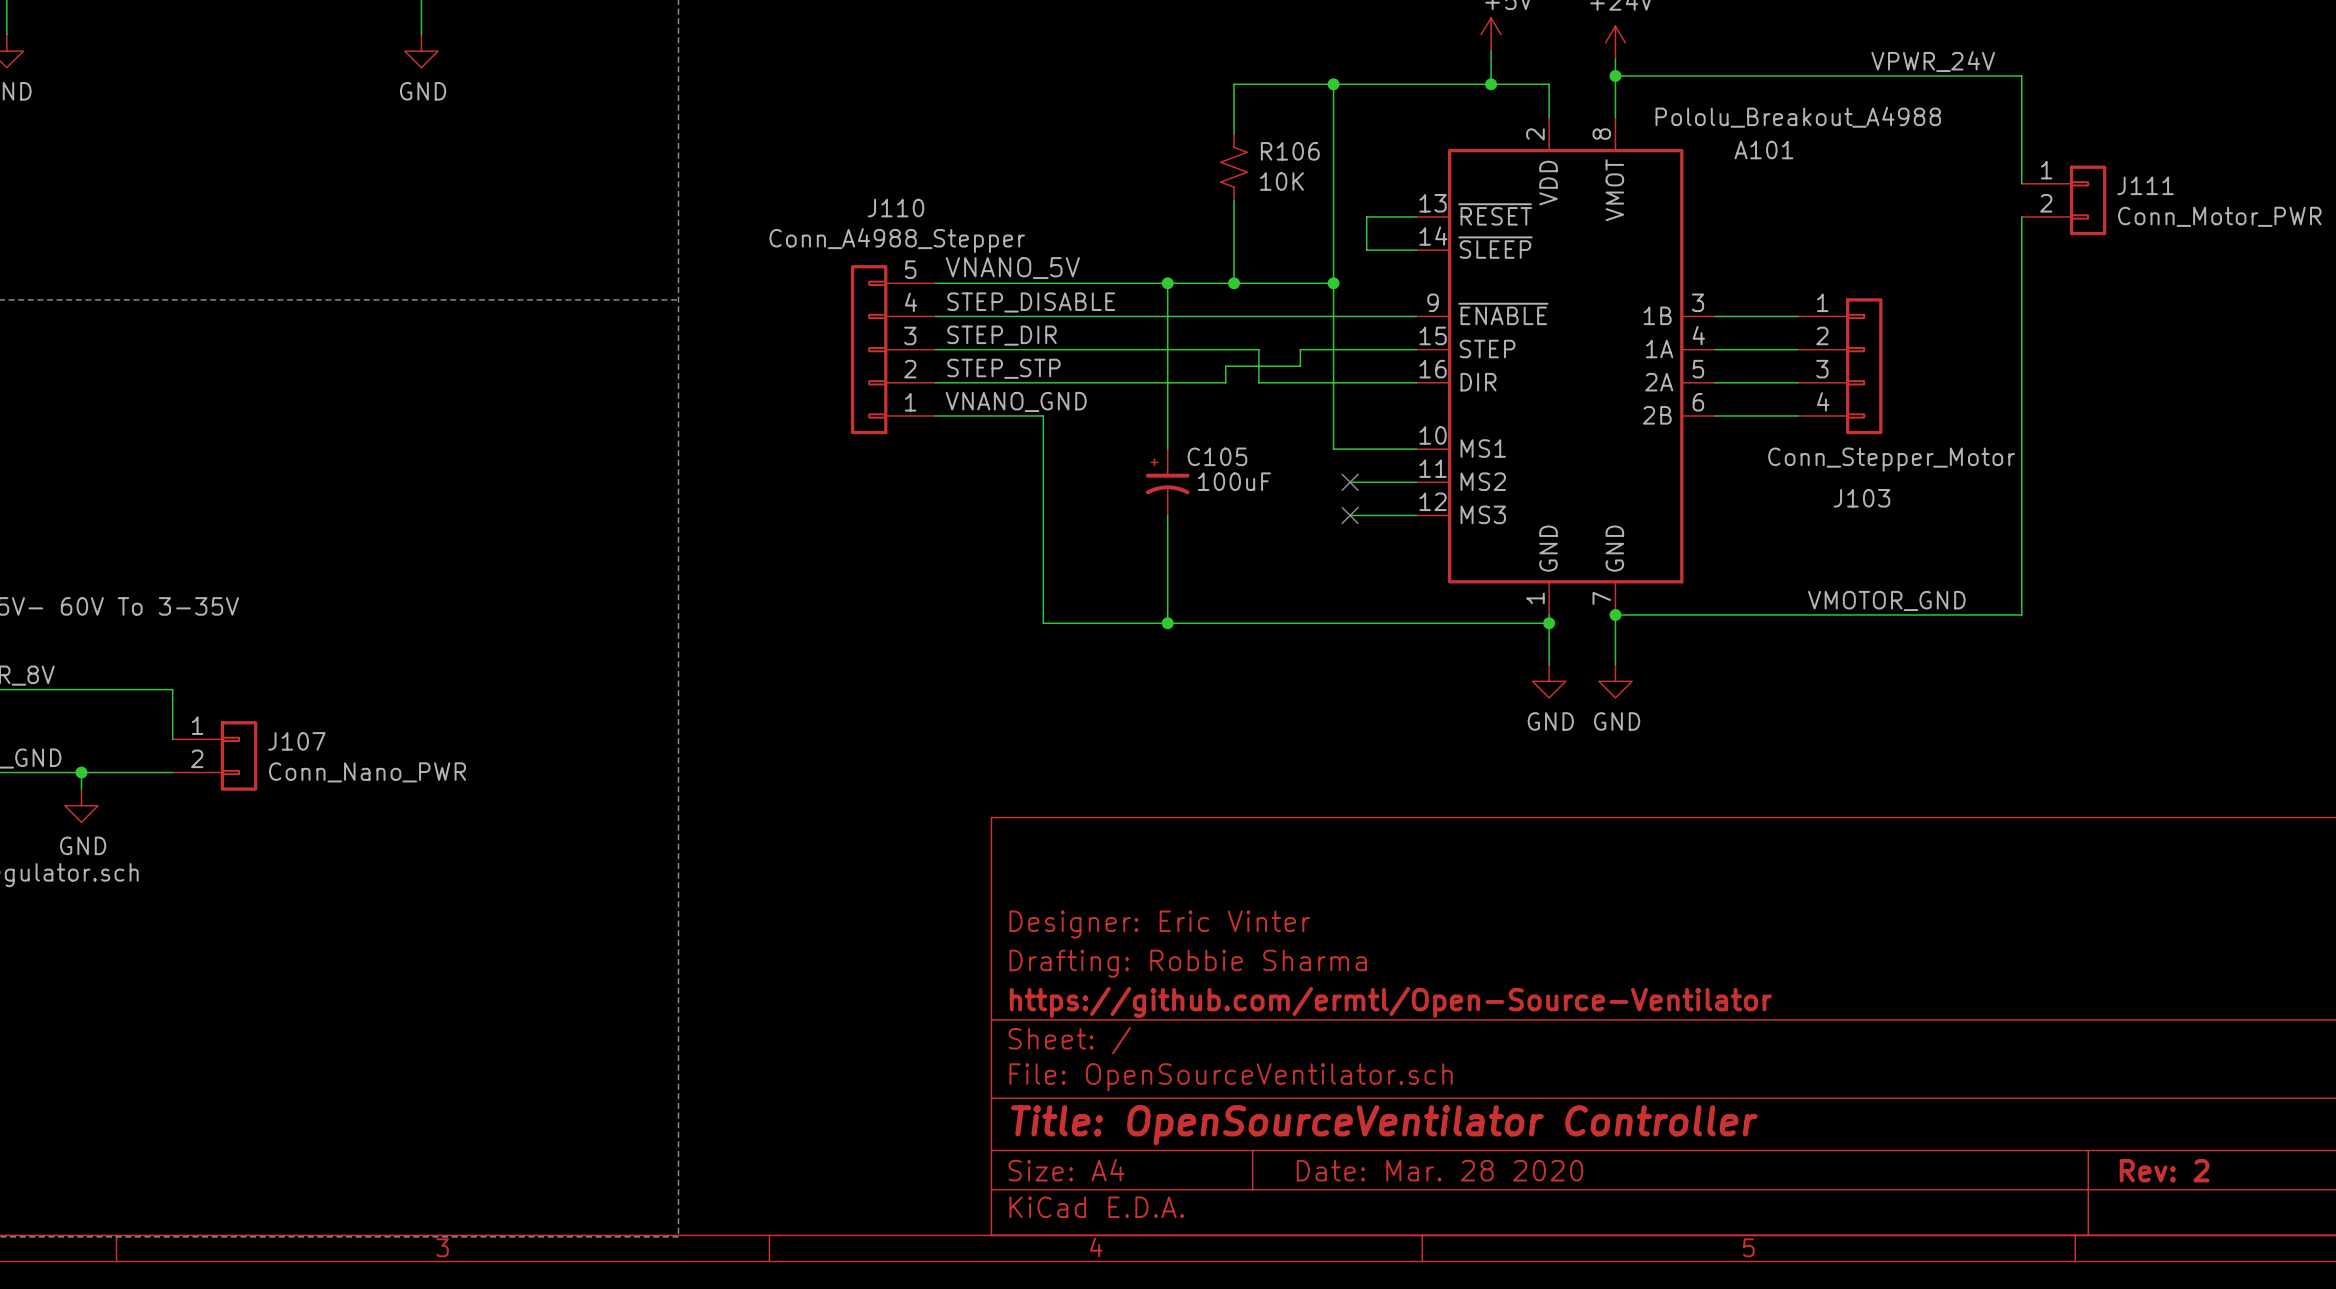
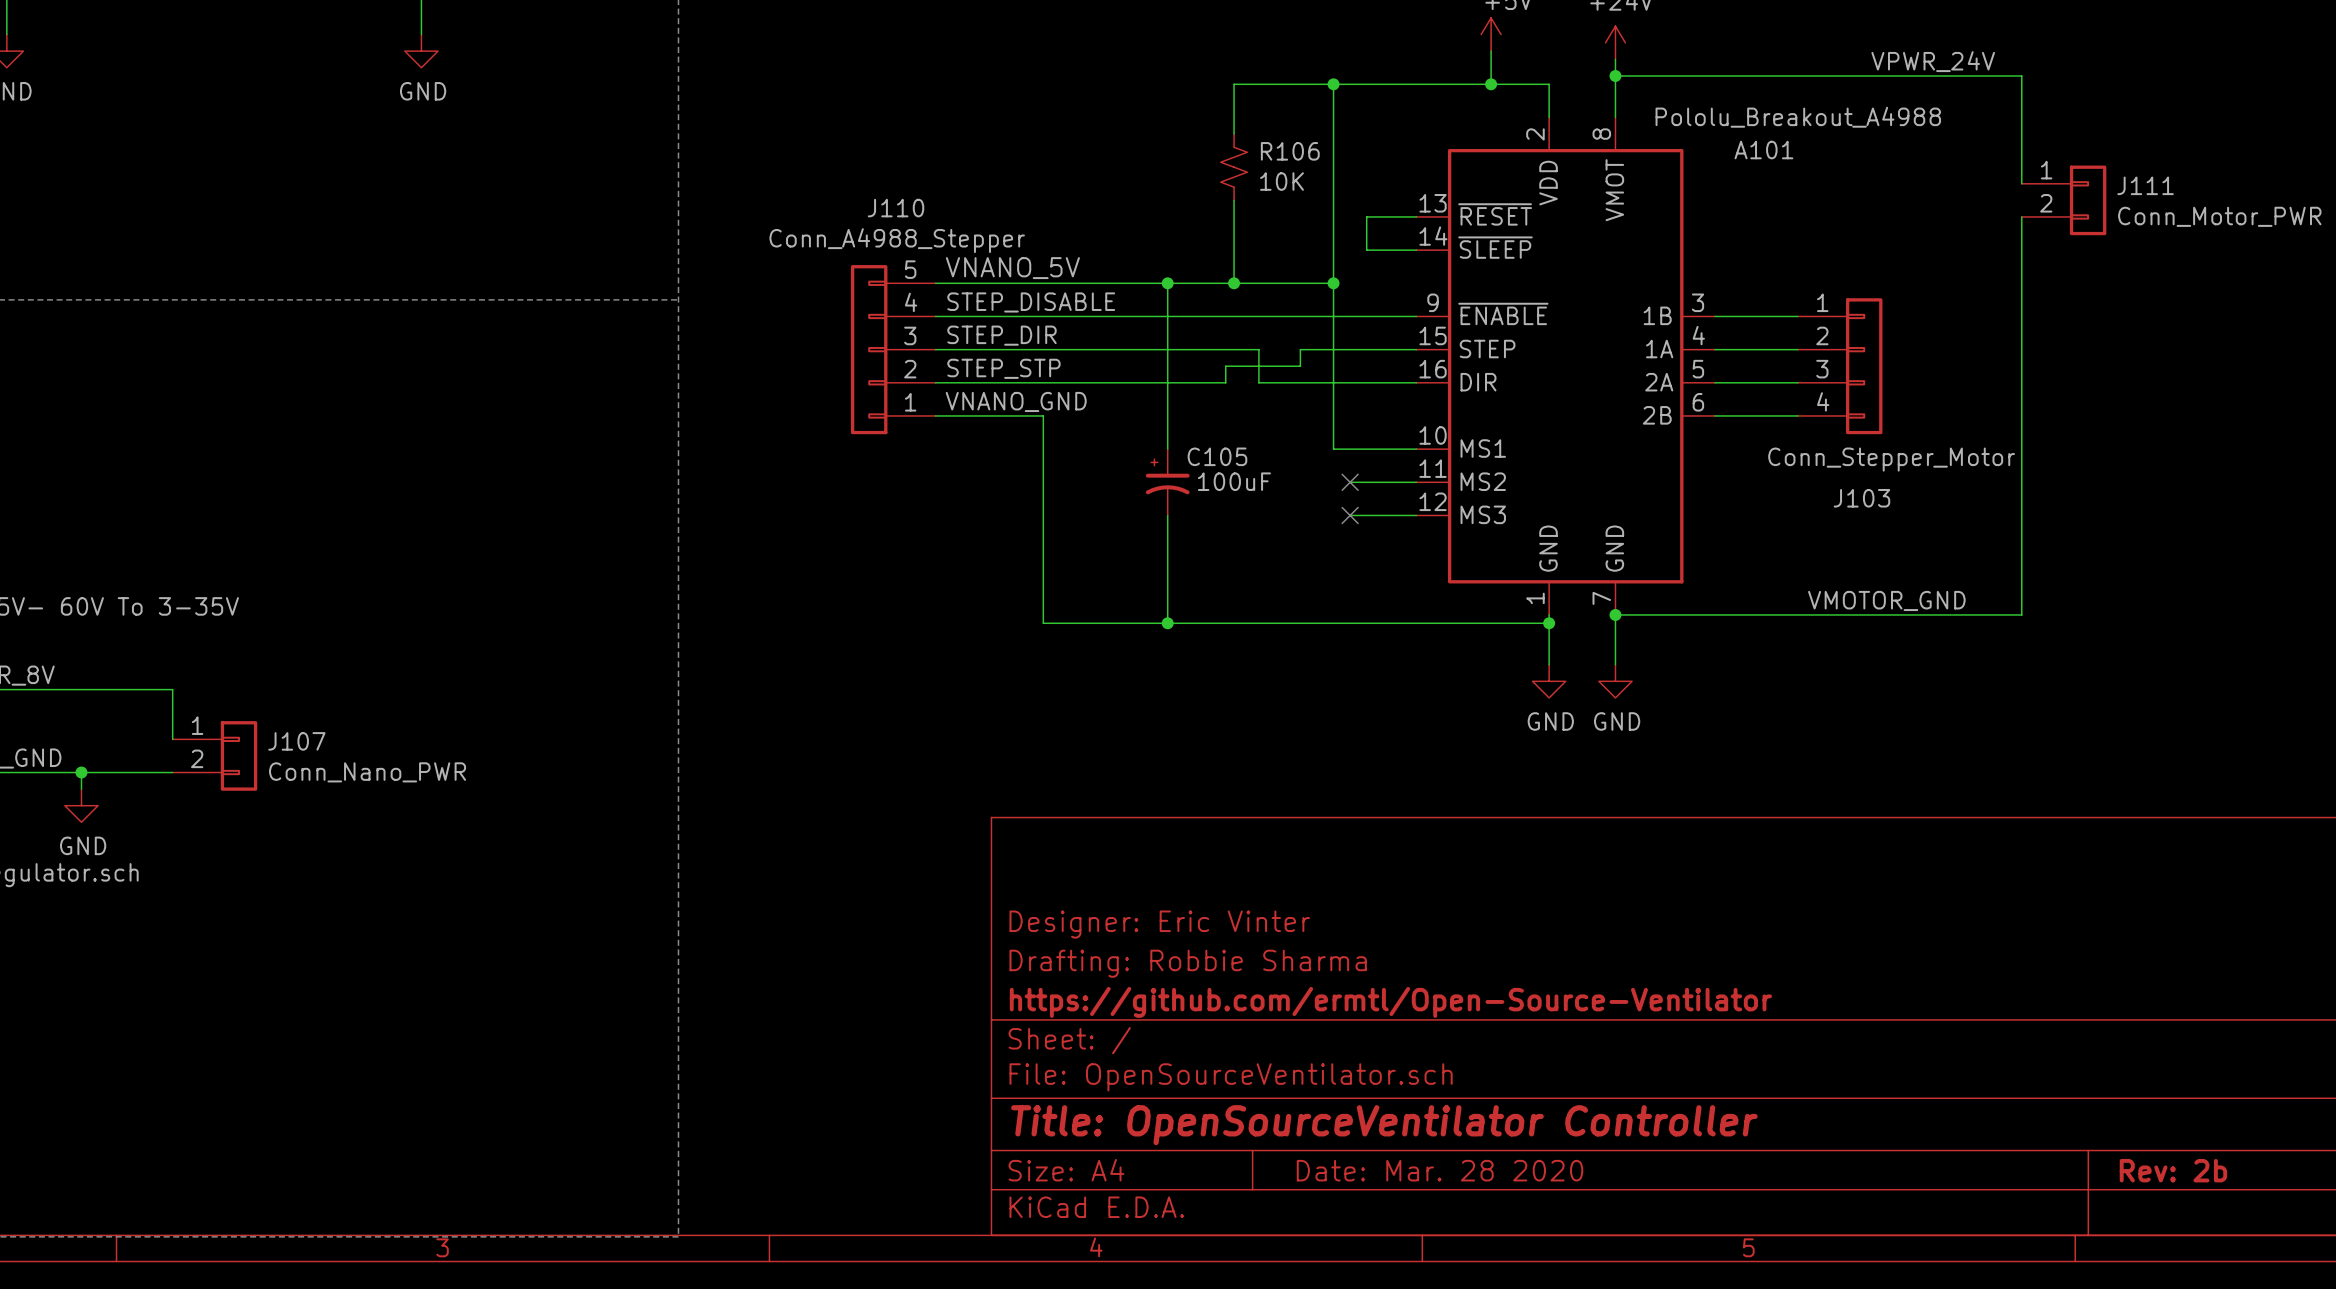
title block: Rev: 2 (2164, 1170) -> Rev: 2b (2173, 1170)

